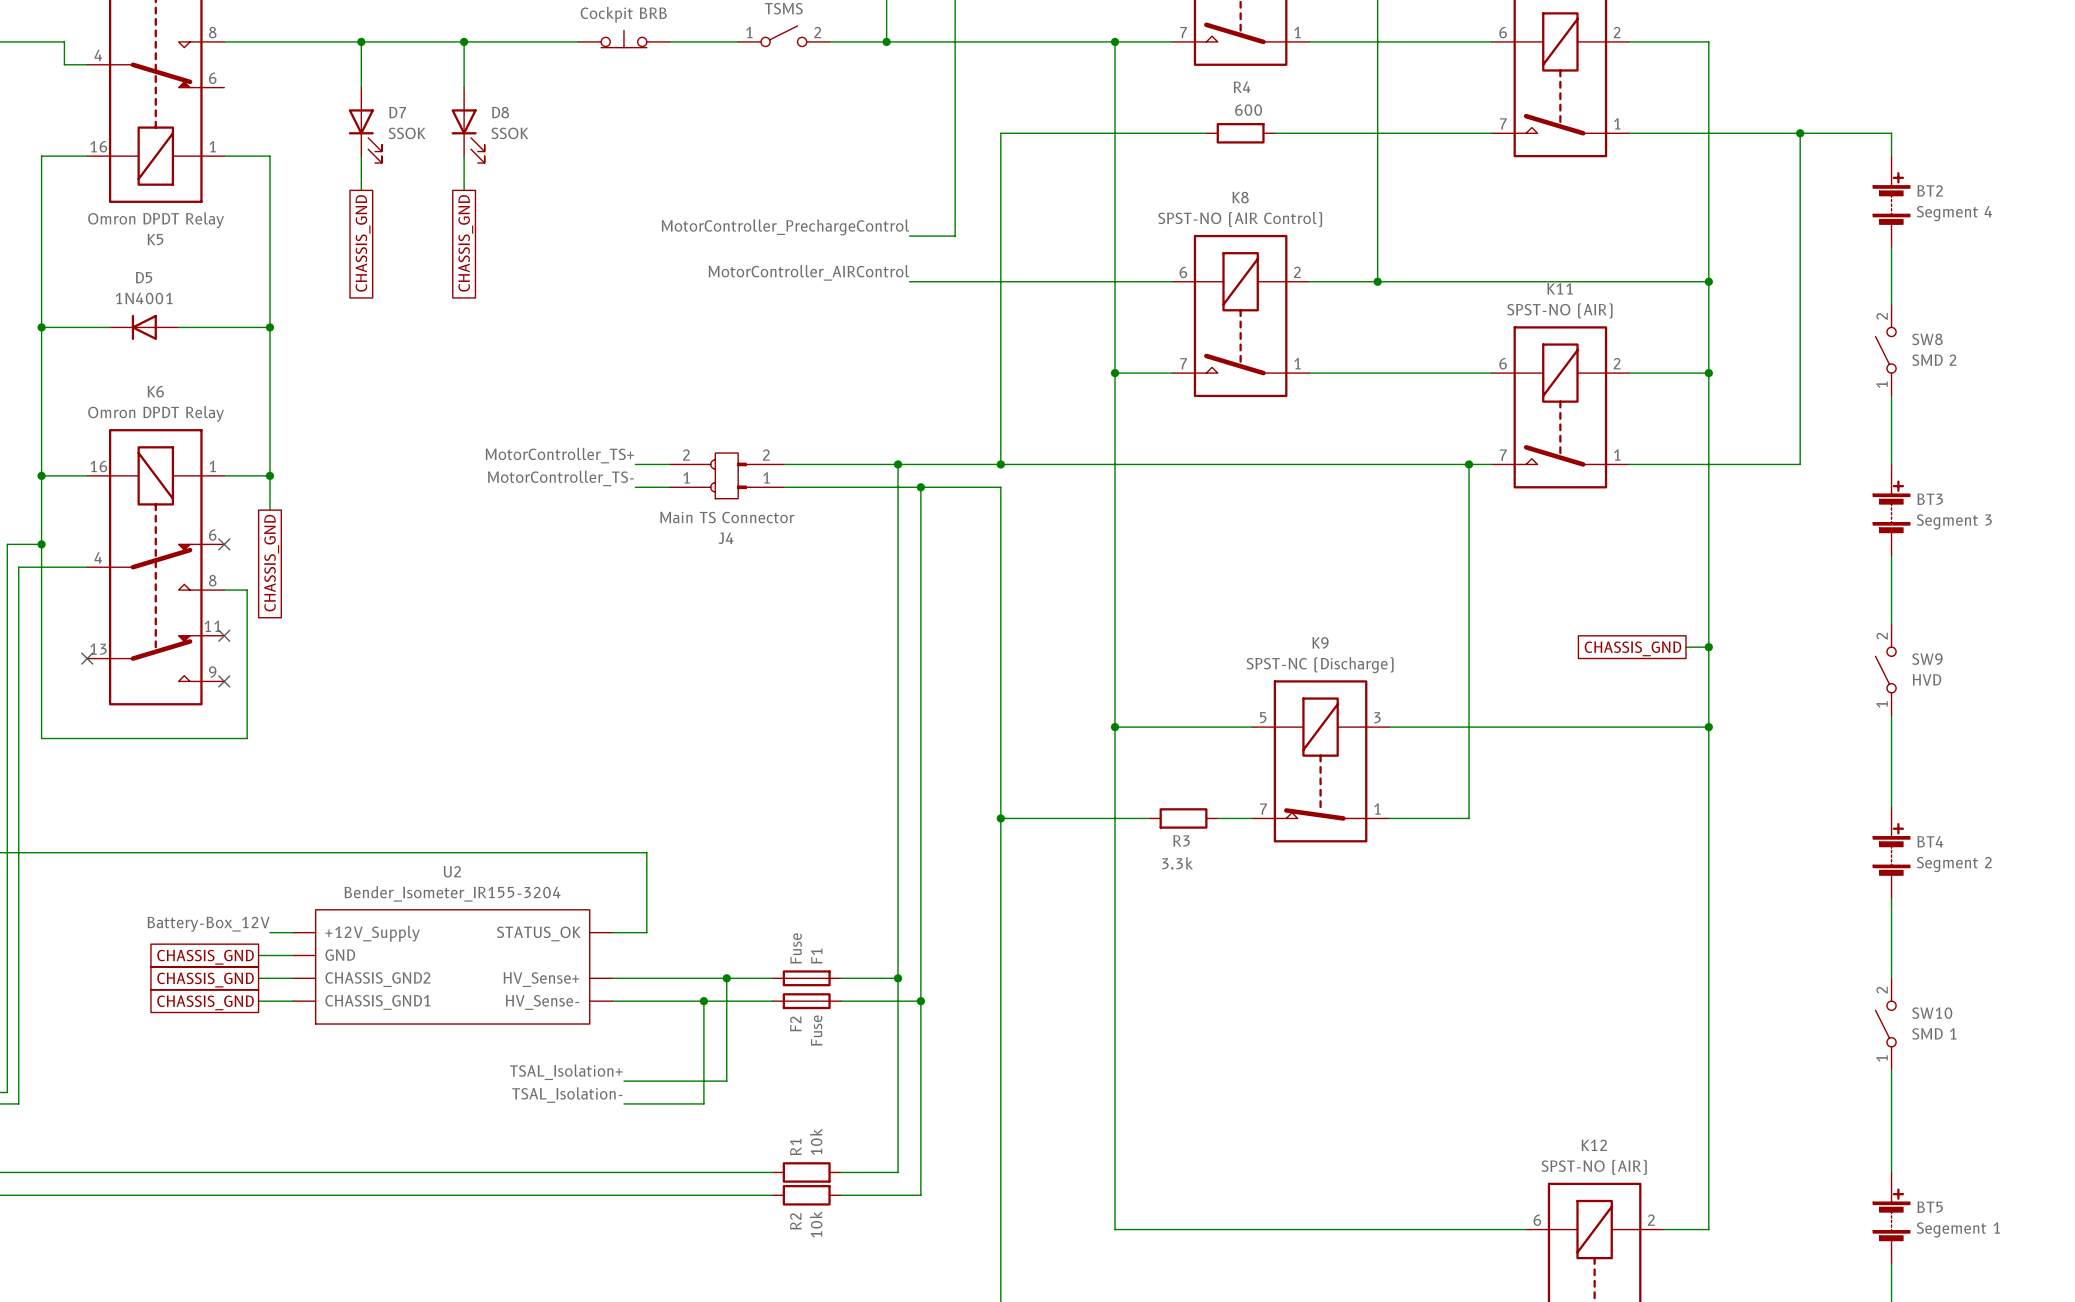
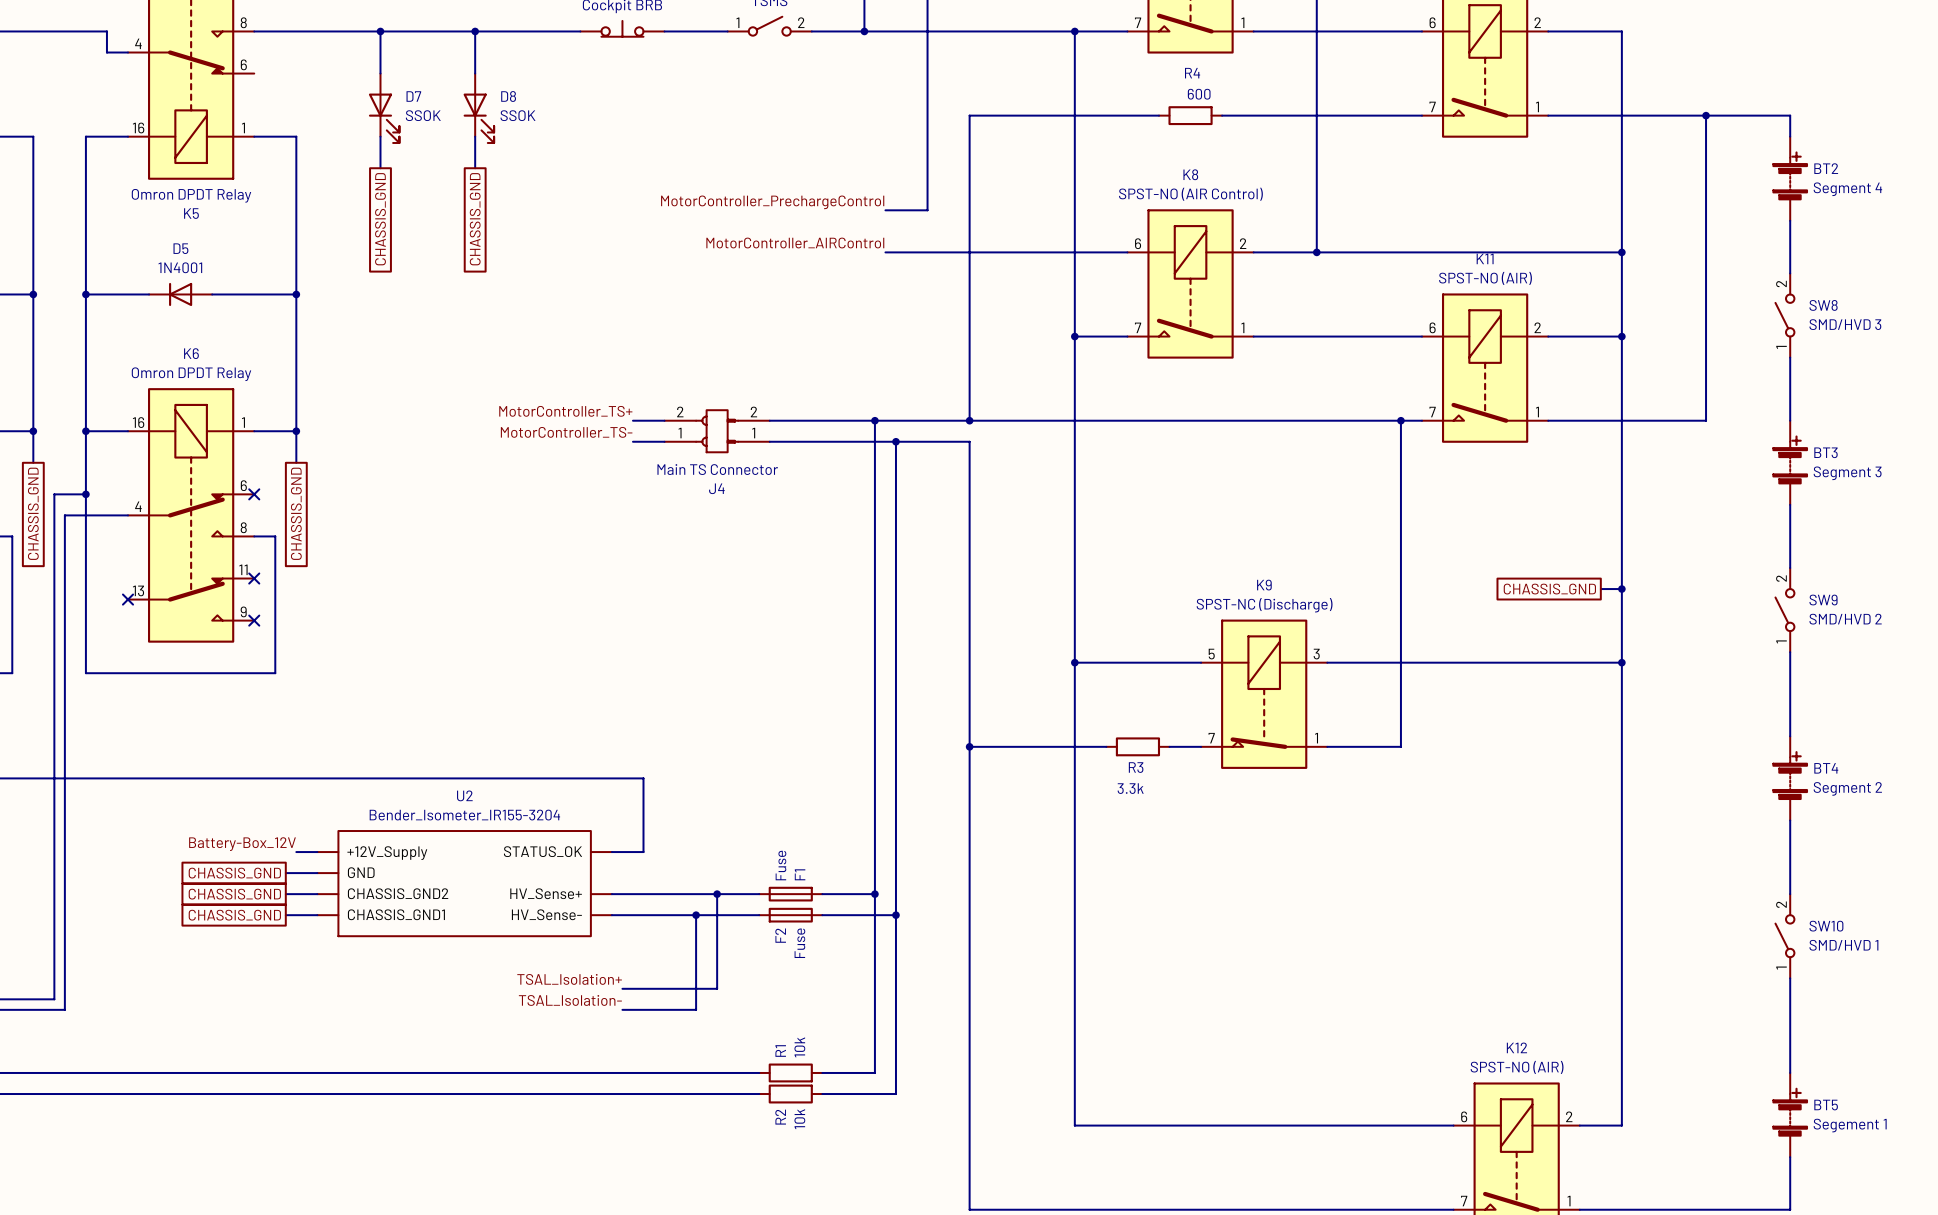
SW8 value: SMD 2 (1934, 360) -> SMD/HVD 3 (1845, 324)
SW9 value: HVD (1927, 679) -> SMD/HVD 2 (1845, 619)
SW10 value: SMD 1 (1934, 1033) -> SMD/HVD 1 (1843, 945)

